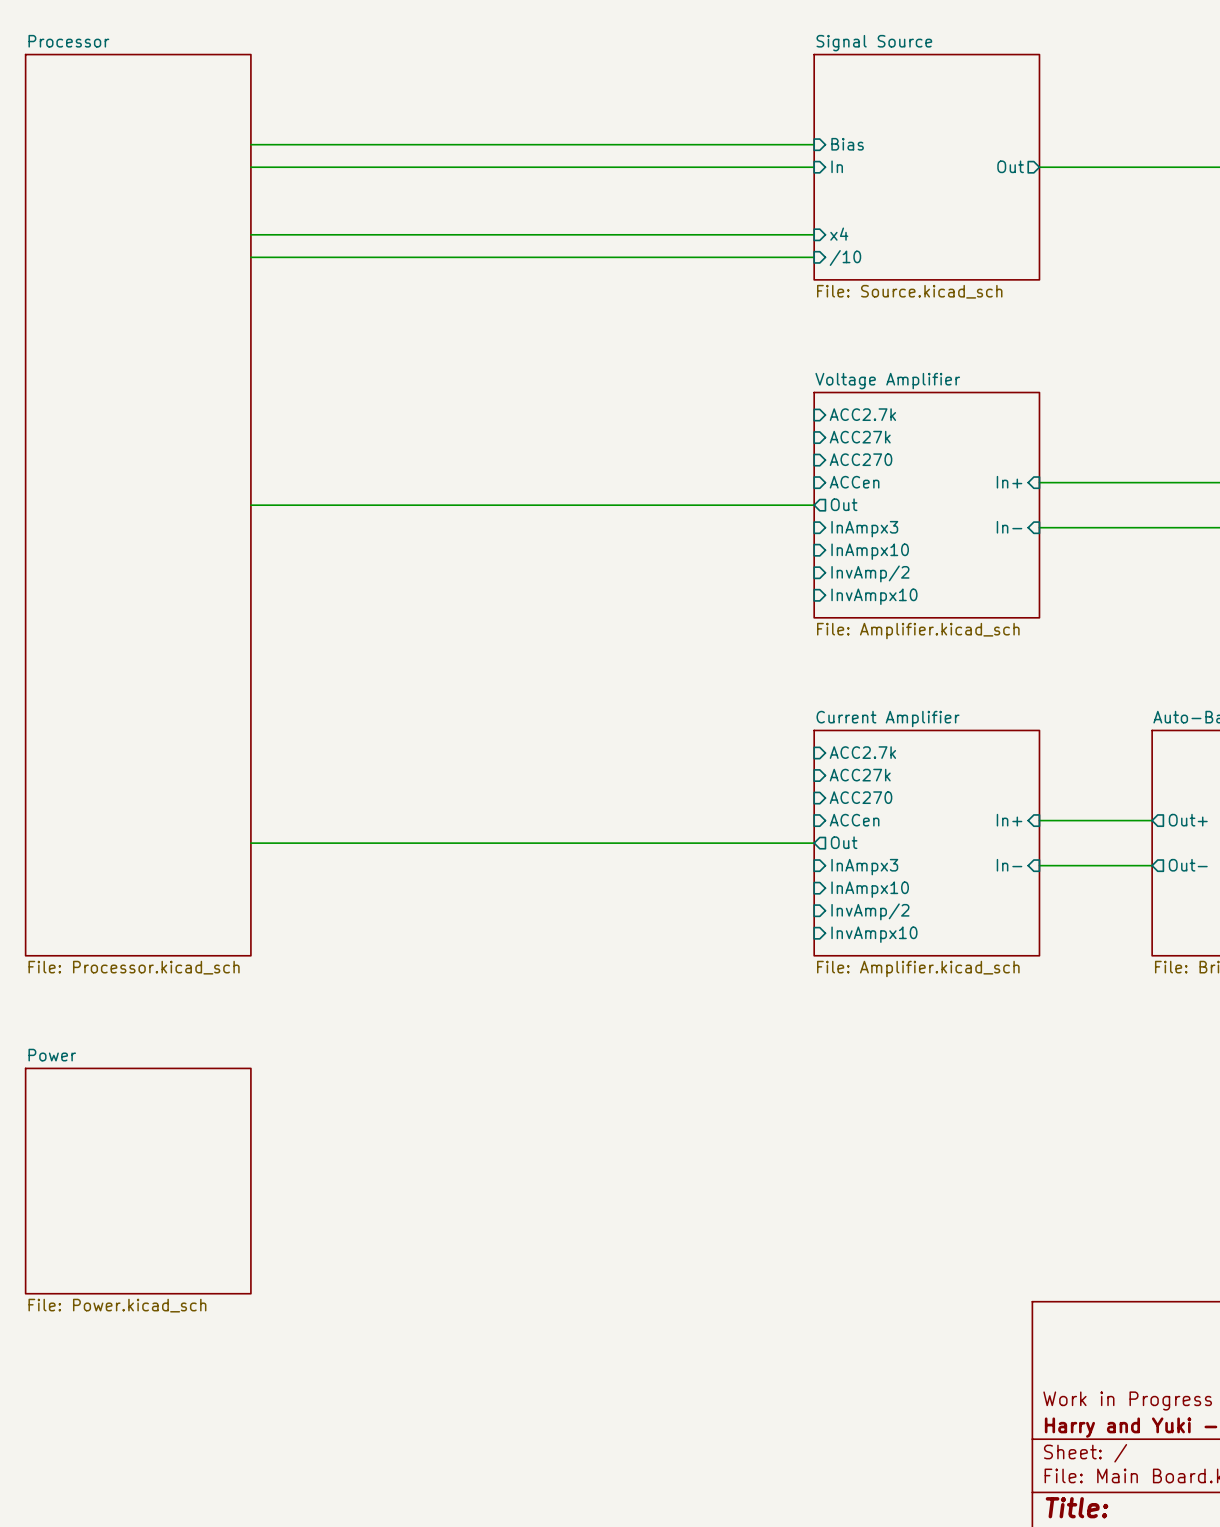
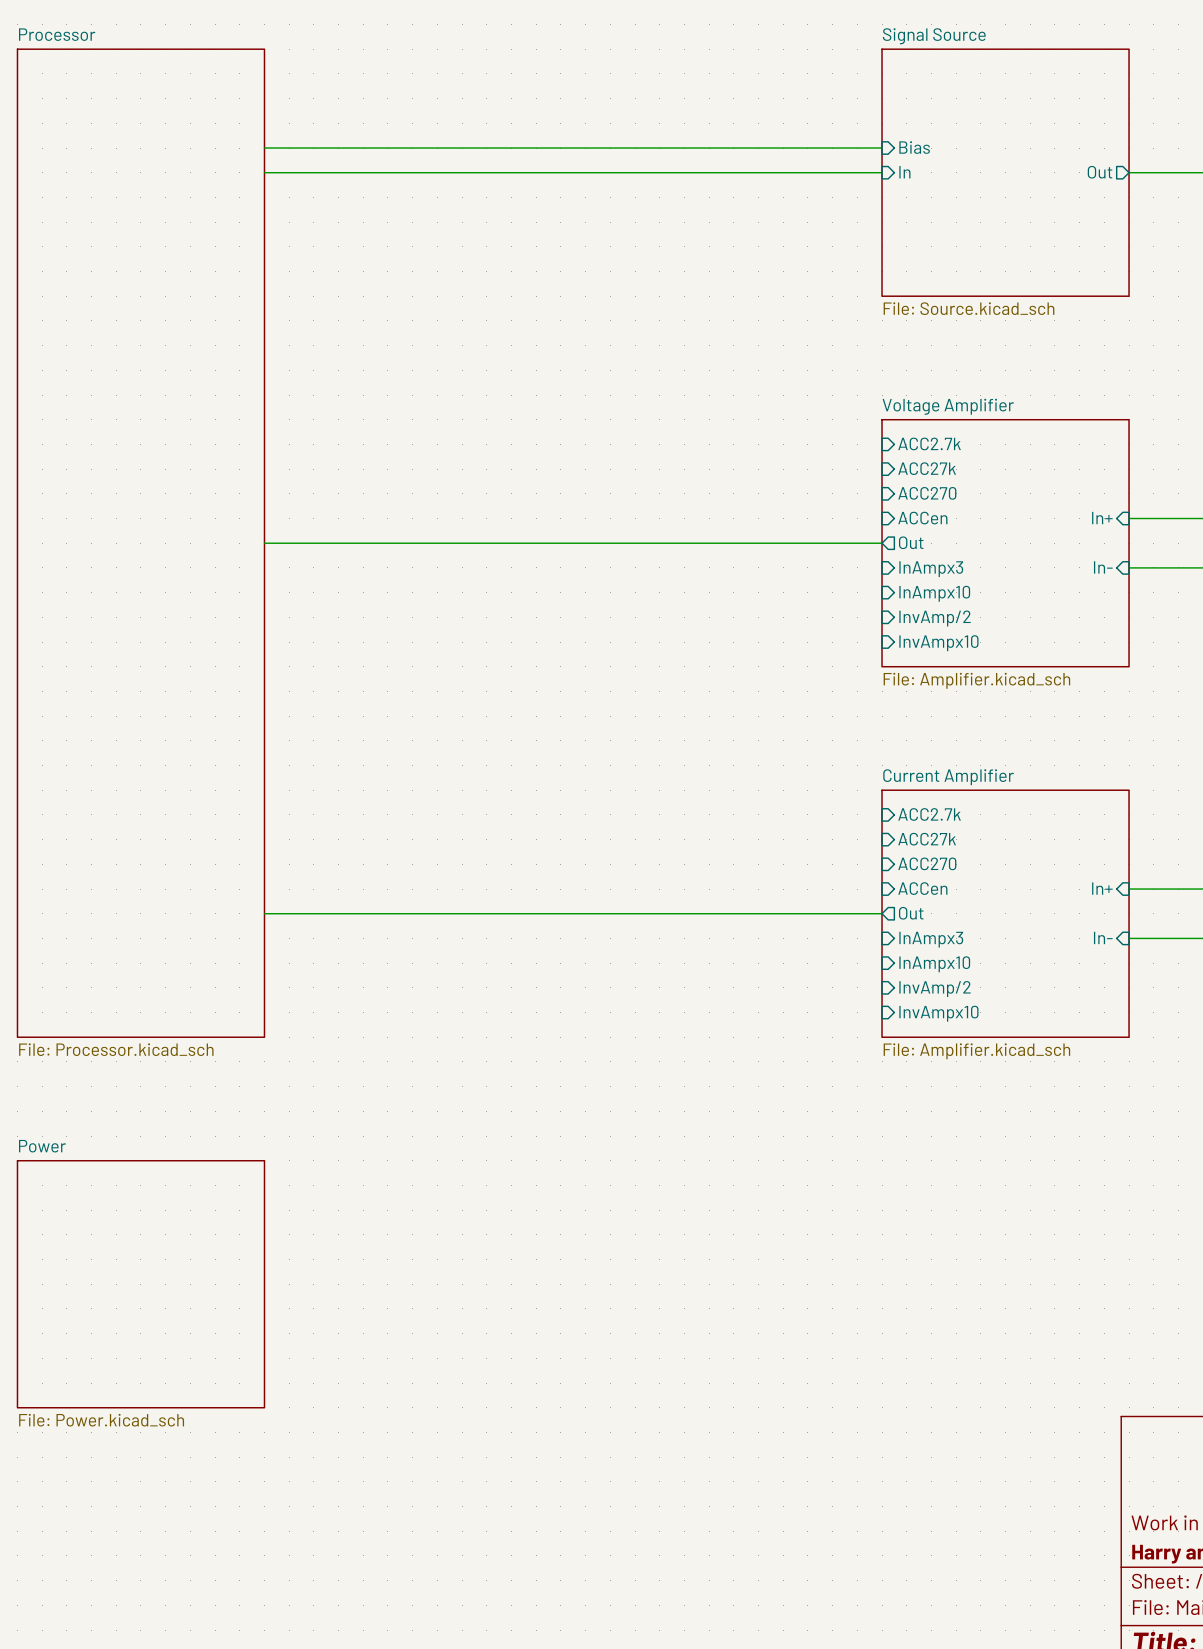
wire: (250, 234) (814, 234) -> none
sheet pin: x4 (839, 234) -> none
wire: (250, 257) (814, 257) -> none
sheet pin: /10 (845, 257) -> none

